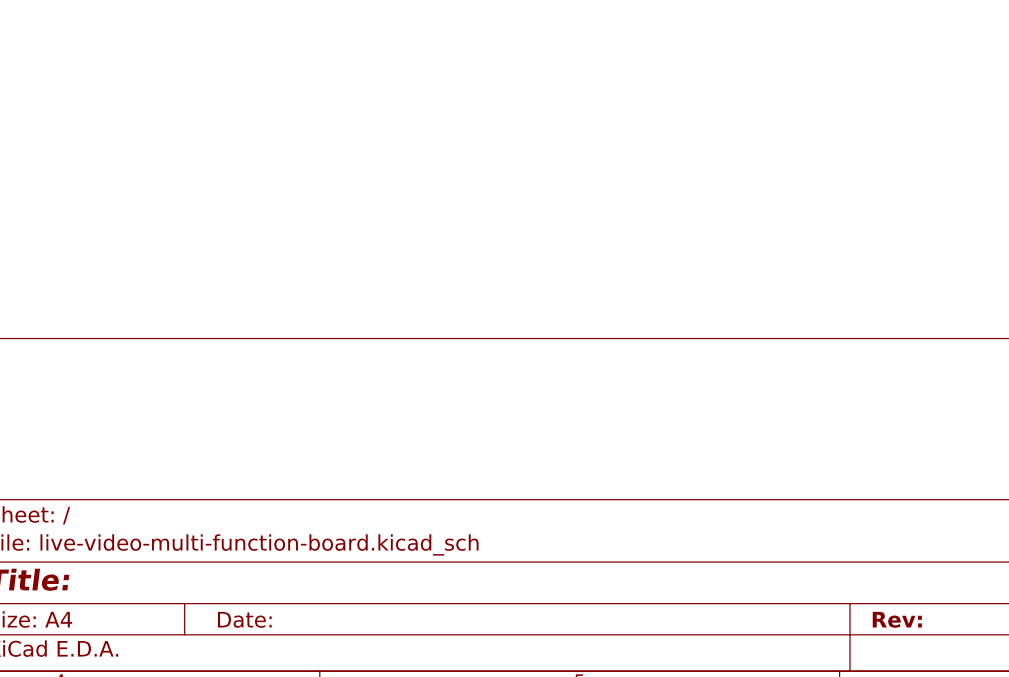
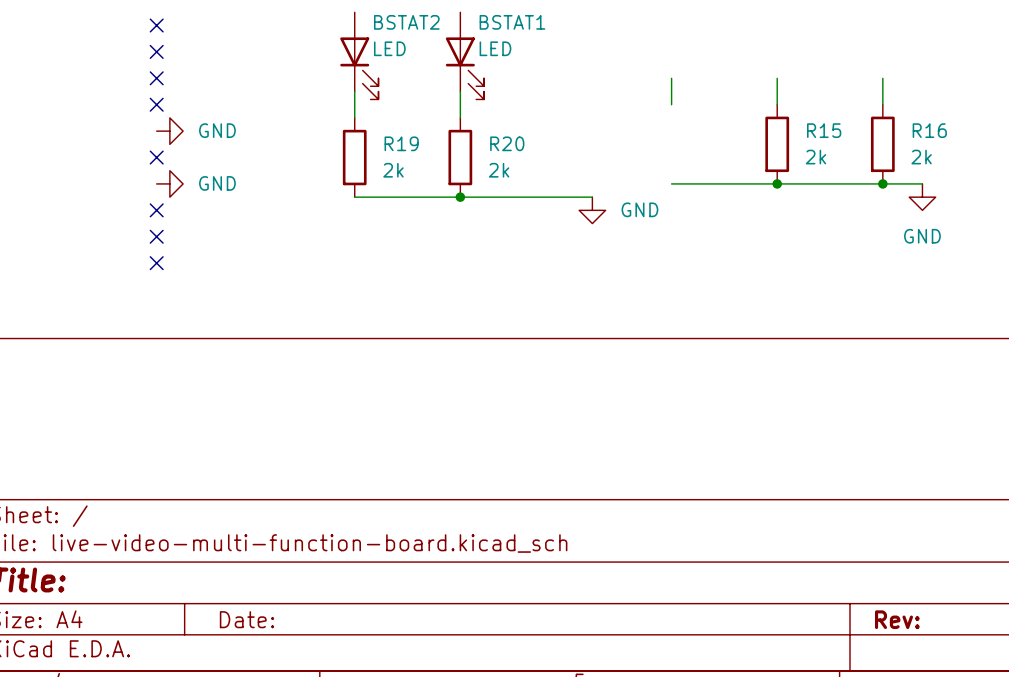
no-connect mark: none -> (156, 25)
no-connect mark: none -> (156, 51)
BSTAT2: none -> LED (359, 55)
BSTAT1: none -> LED (464, 55)
no-connect mark: none -> (156, 78)
wire: none -> (671, 78) (671, 104)
wire: none -> (777, 78) (777, 104)
wire: none -> (882, 78) (882, 104)
wire: none -> (354, 91) (354, 117)
wire: none -> (460, 91) (460, 117)
no-connect mark: none -> (156, 104)
power symbol: none -> GND (169, 131)
R15: none -> 2k (777, 144)
R16: none -> 2k (882, 144)
no-connect mark: none -> (156, 157)
R19: none -> 2k (354, 157)
R20: none -> 2k (460, 157)
power symbol: none -> GND (169, 183)
wire: none -> (671, 183) (922, 183)
junction: none -> (777, 183)
junction: none -> (882, 183)
wire: none -> (354, 197) (592, 197)
junction: none -> (460, 197)
power symbol: none -> GND (922, 197)
no-connect mark: none -> (156, 210)
power symbol: none -> GND (592, 210)
no-connect mark: none -> (156, 236)
no-connect mark: none -> (156, 263)

